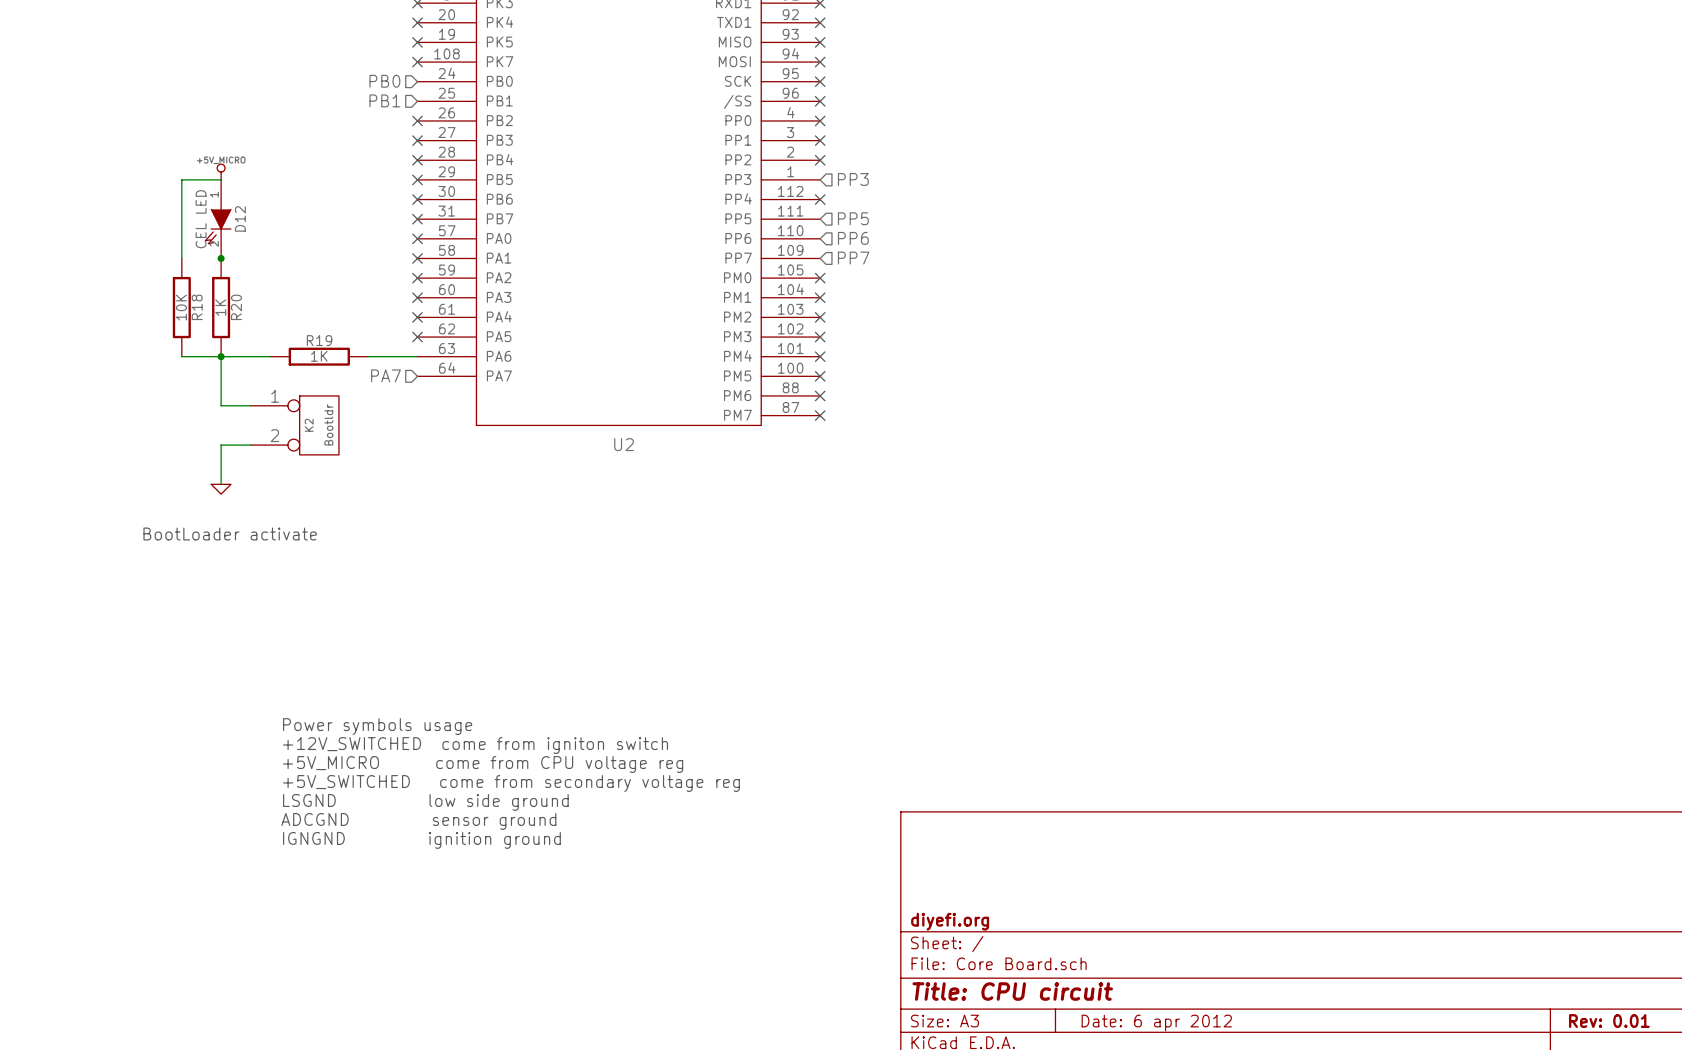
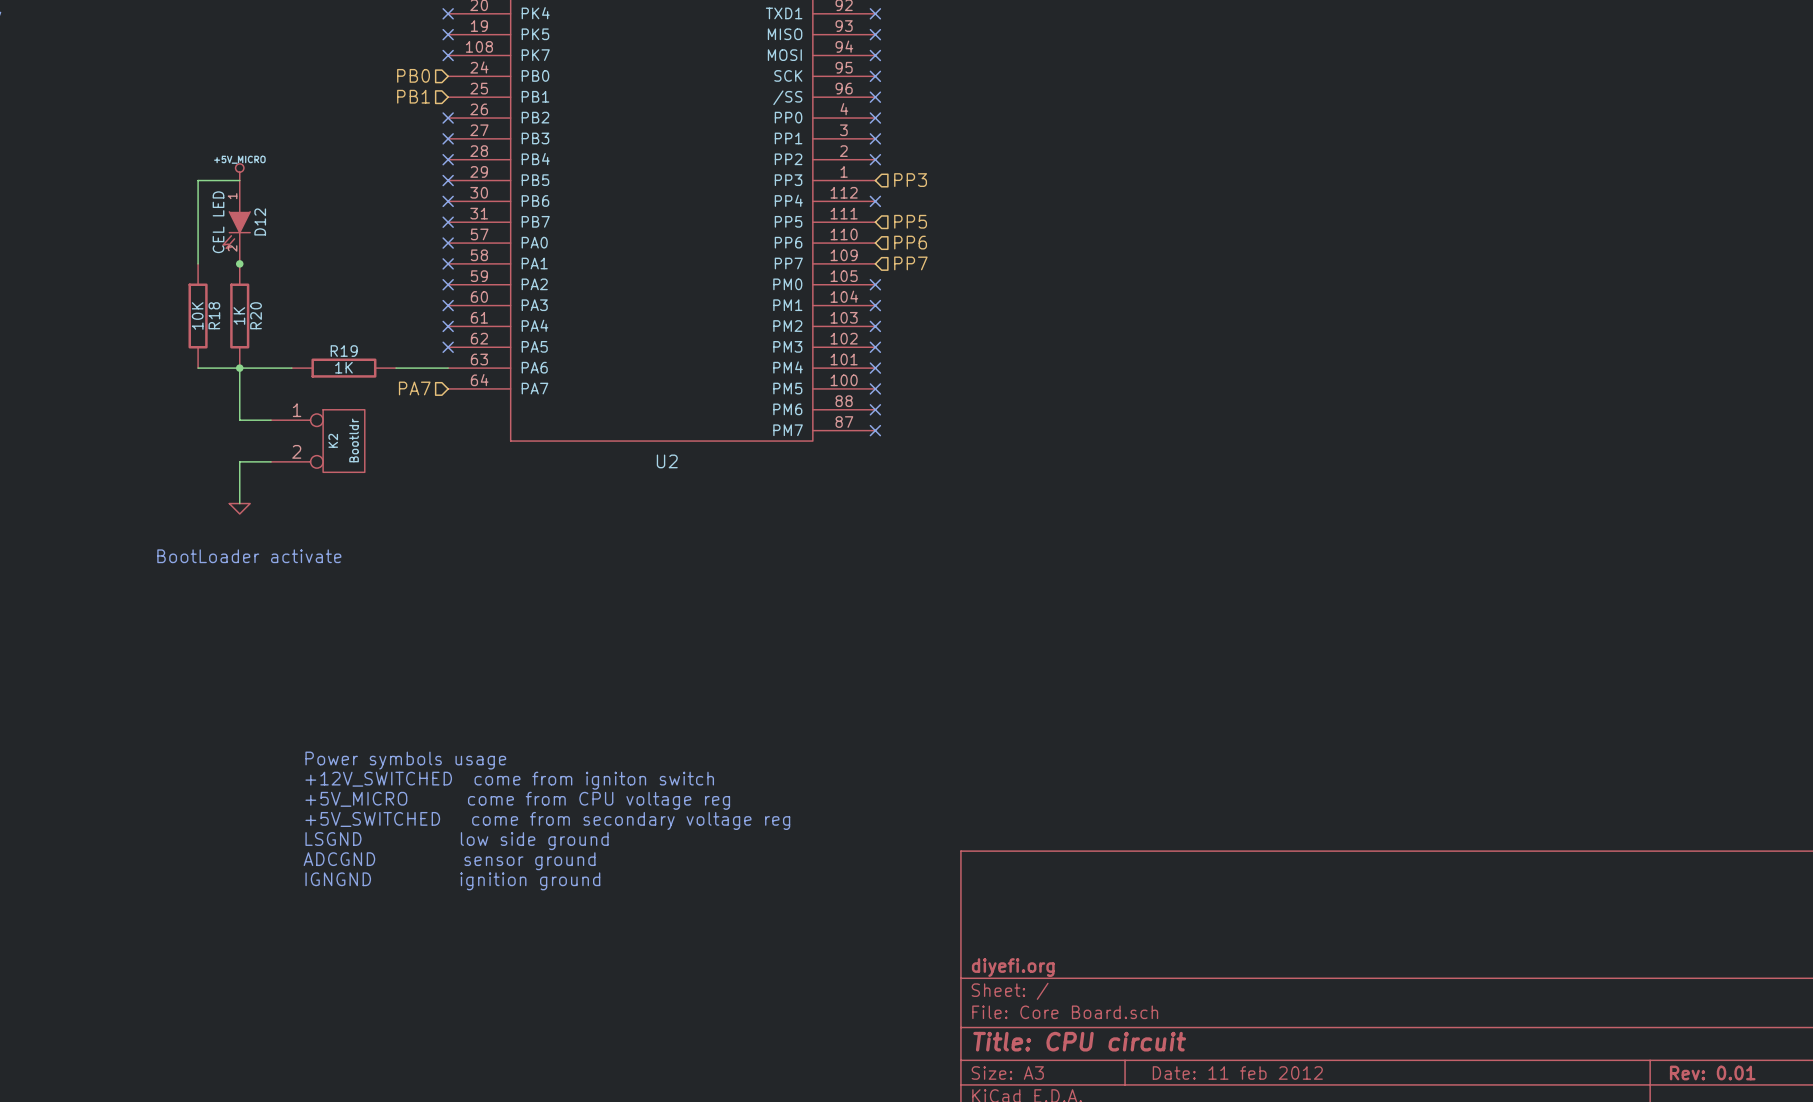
title block: Date: 6 apr 2012 (1156, 1022) -> Date: 11 feb 2012 (1237, 1073)

